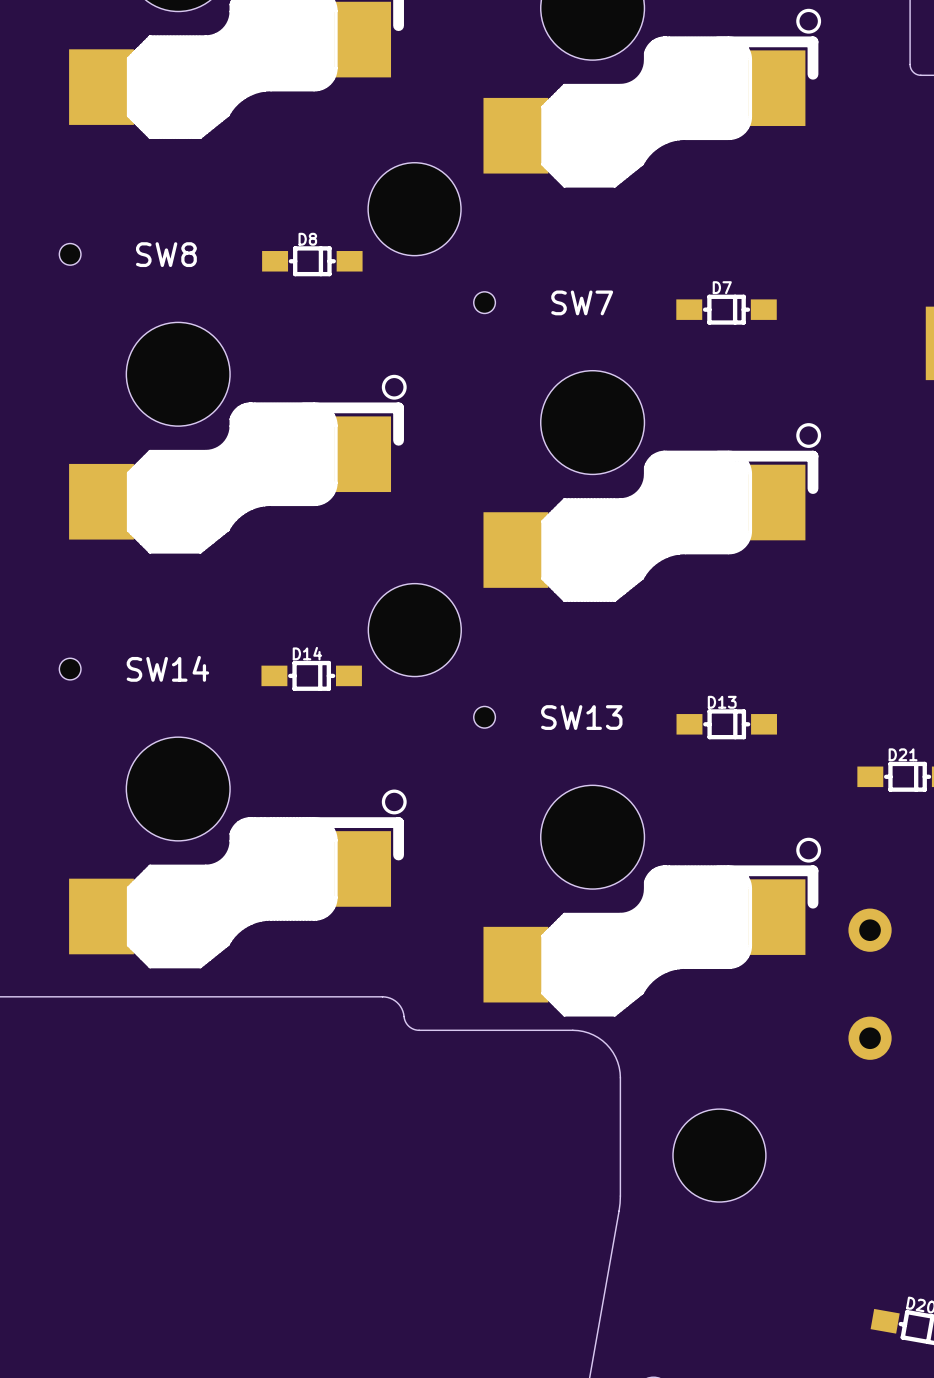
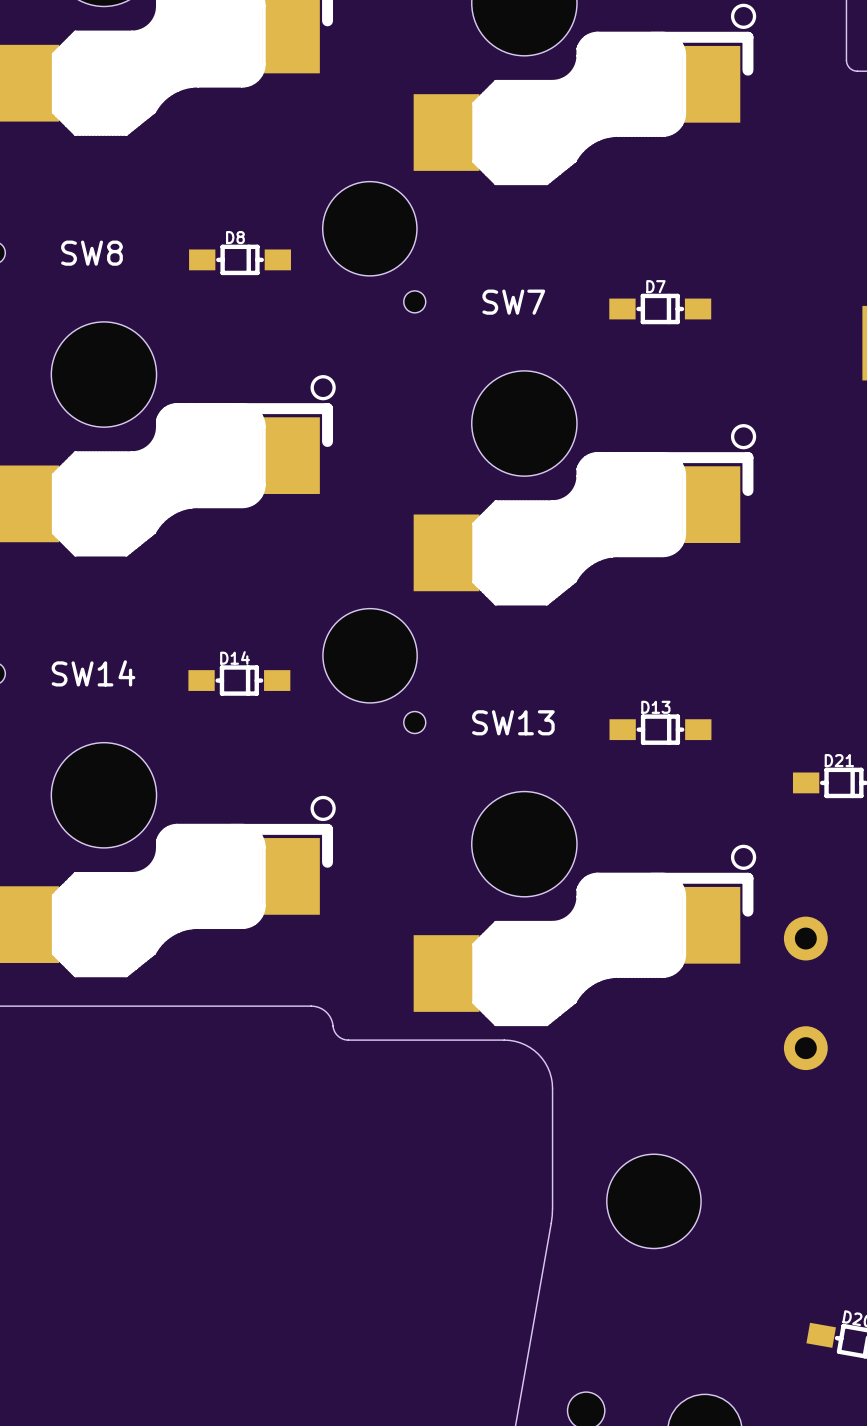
part position: (414, 209) -> (369, 228)
part position: (414, 630) -> (370, 655)
part position: (719, 1155) -> (653, 1201)

